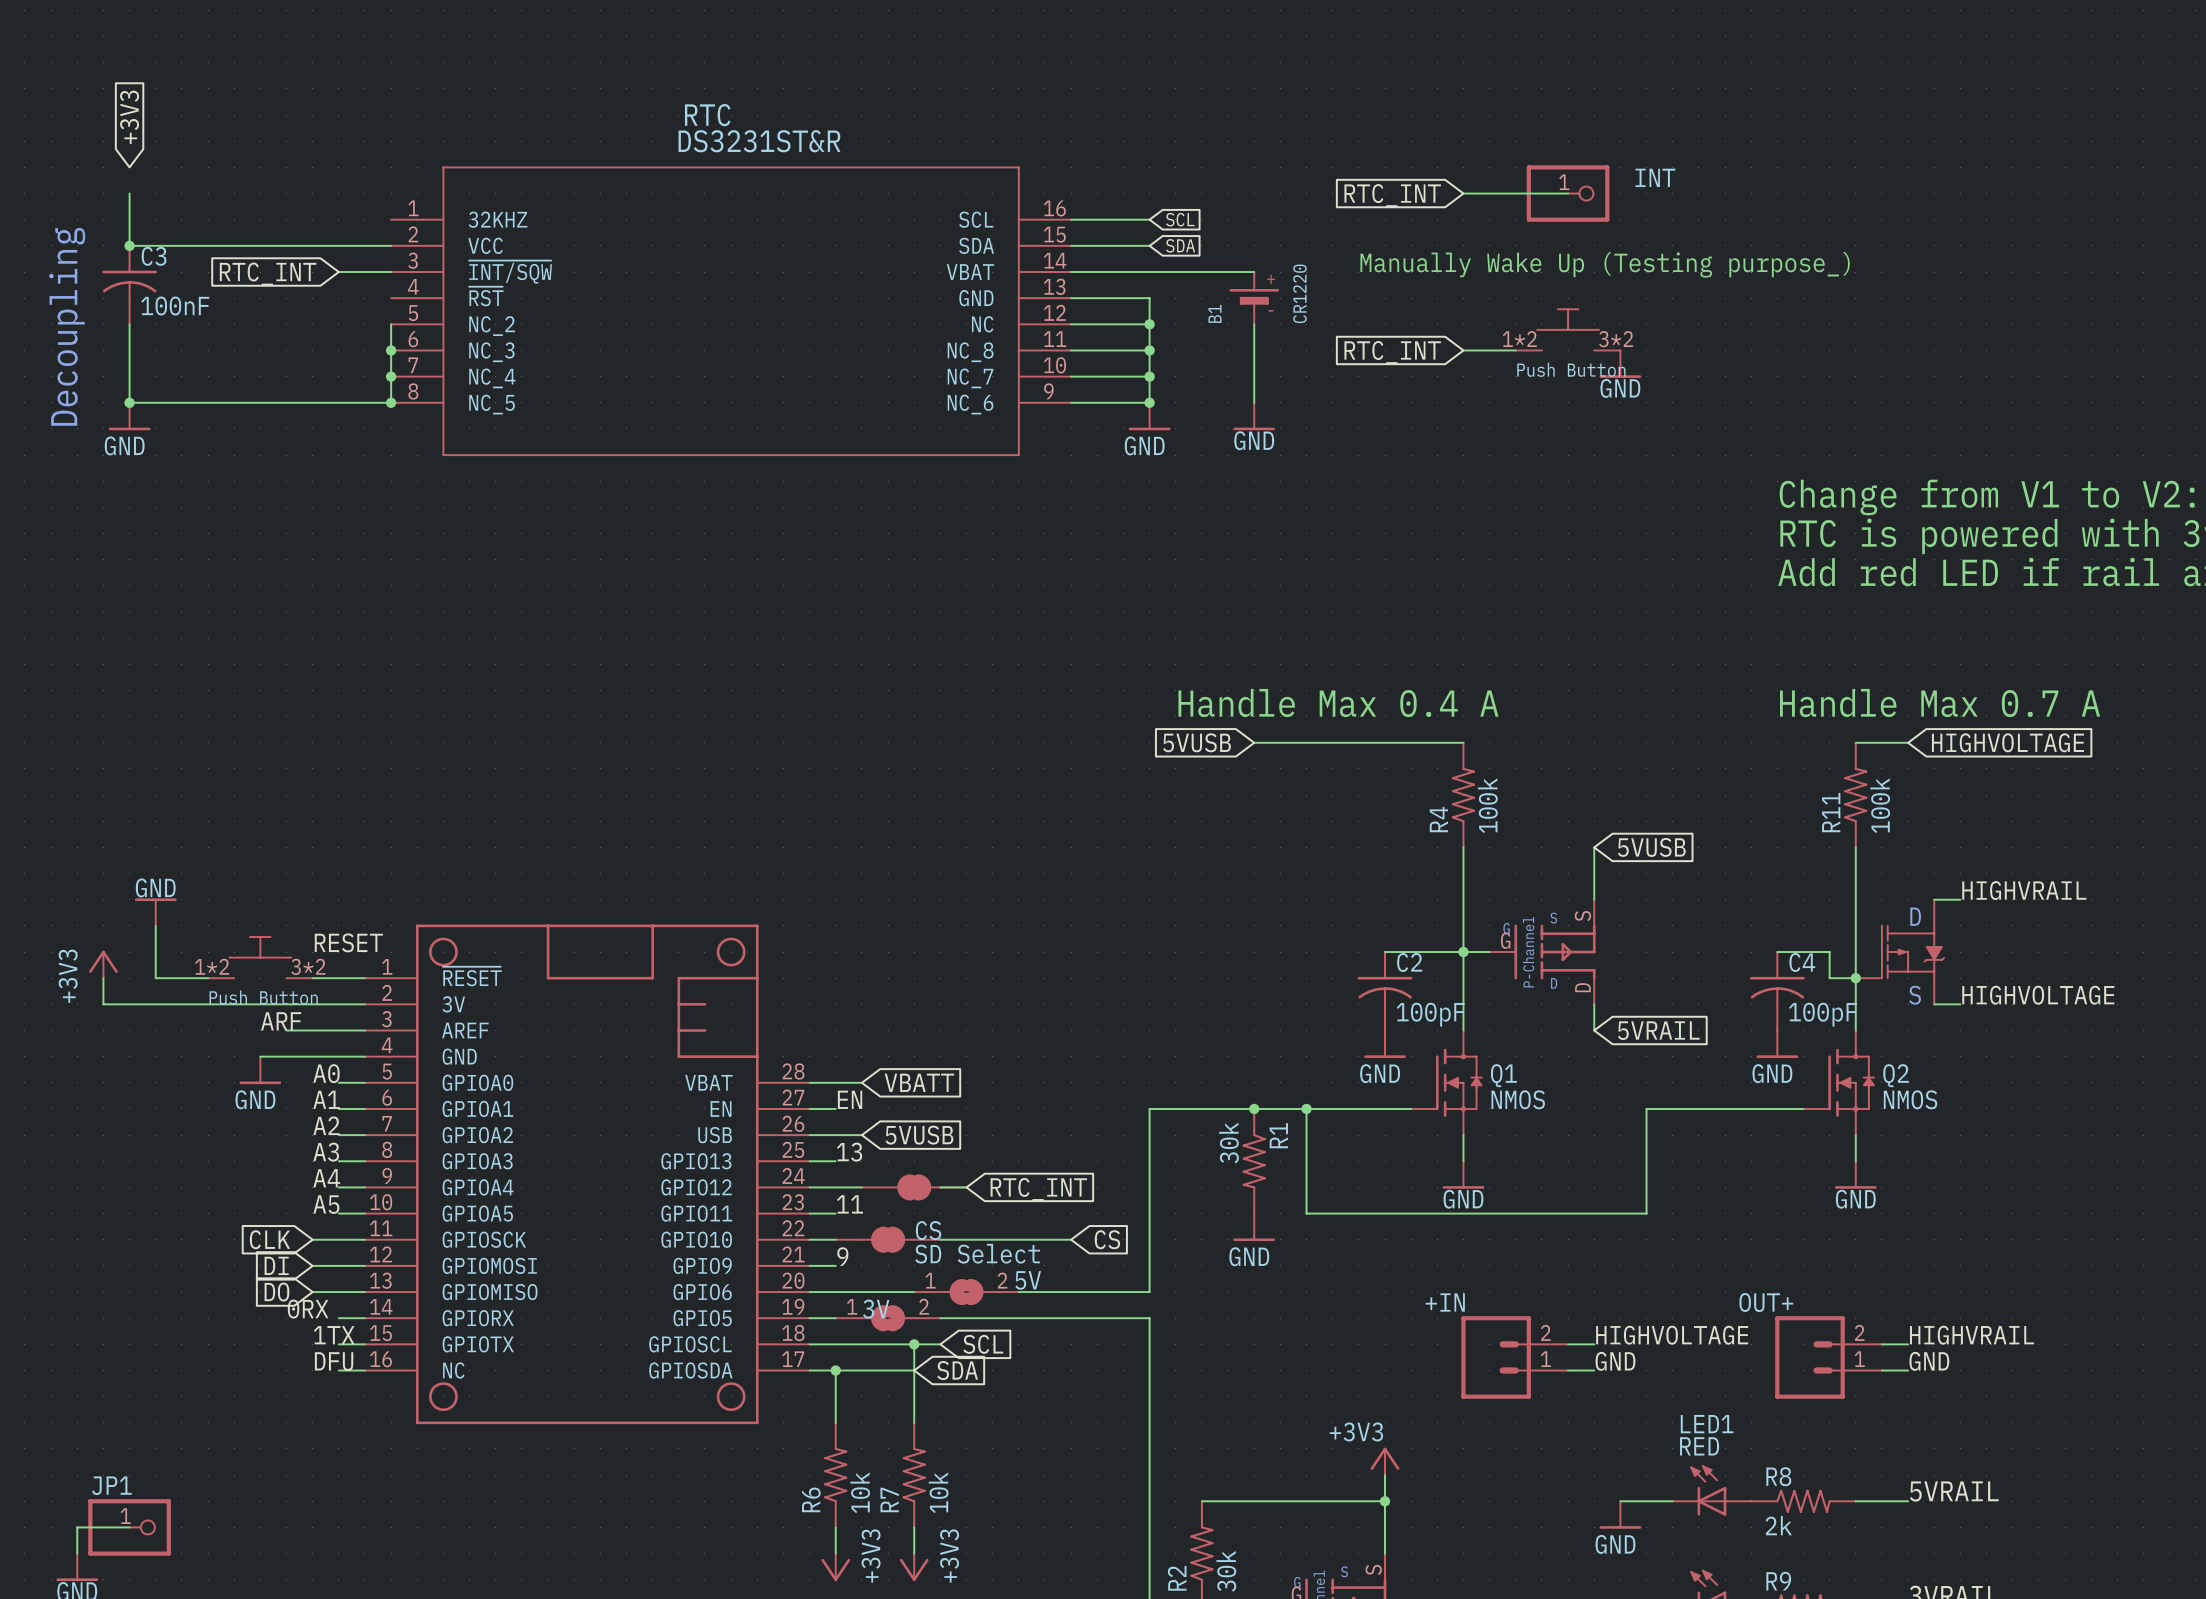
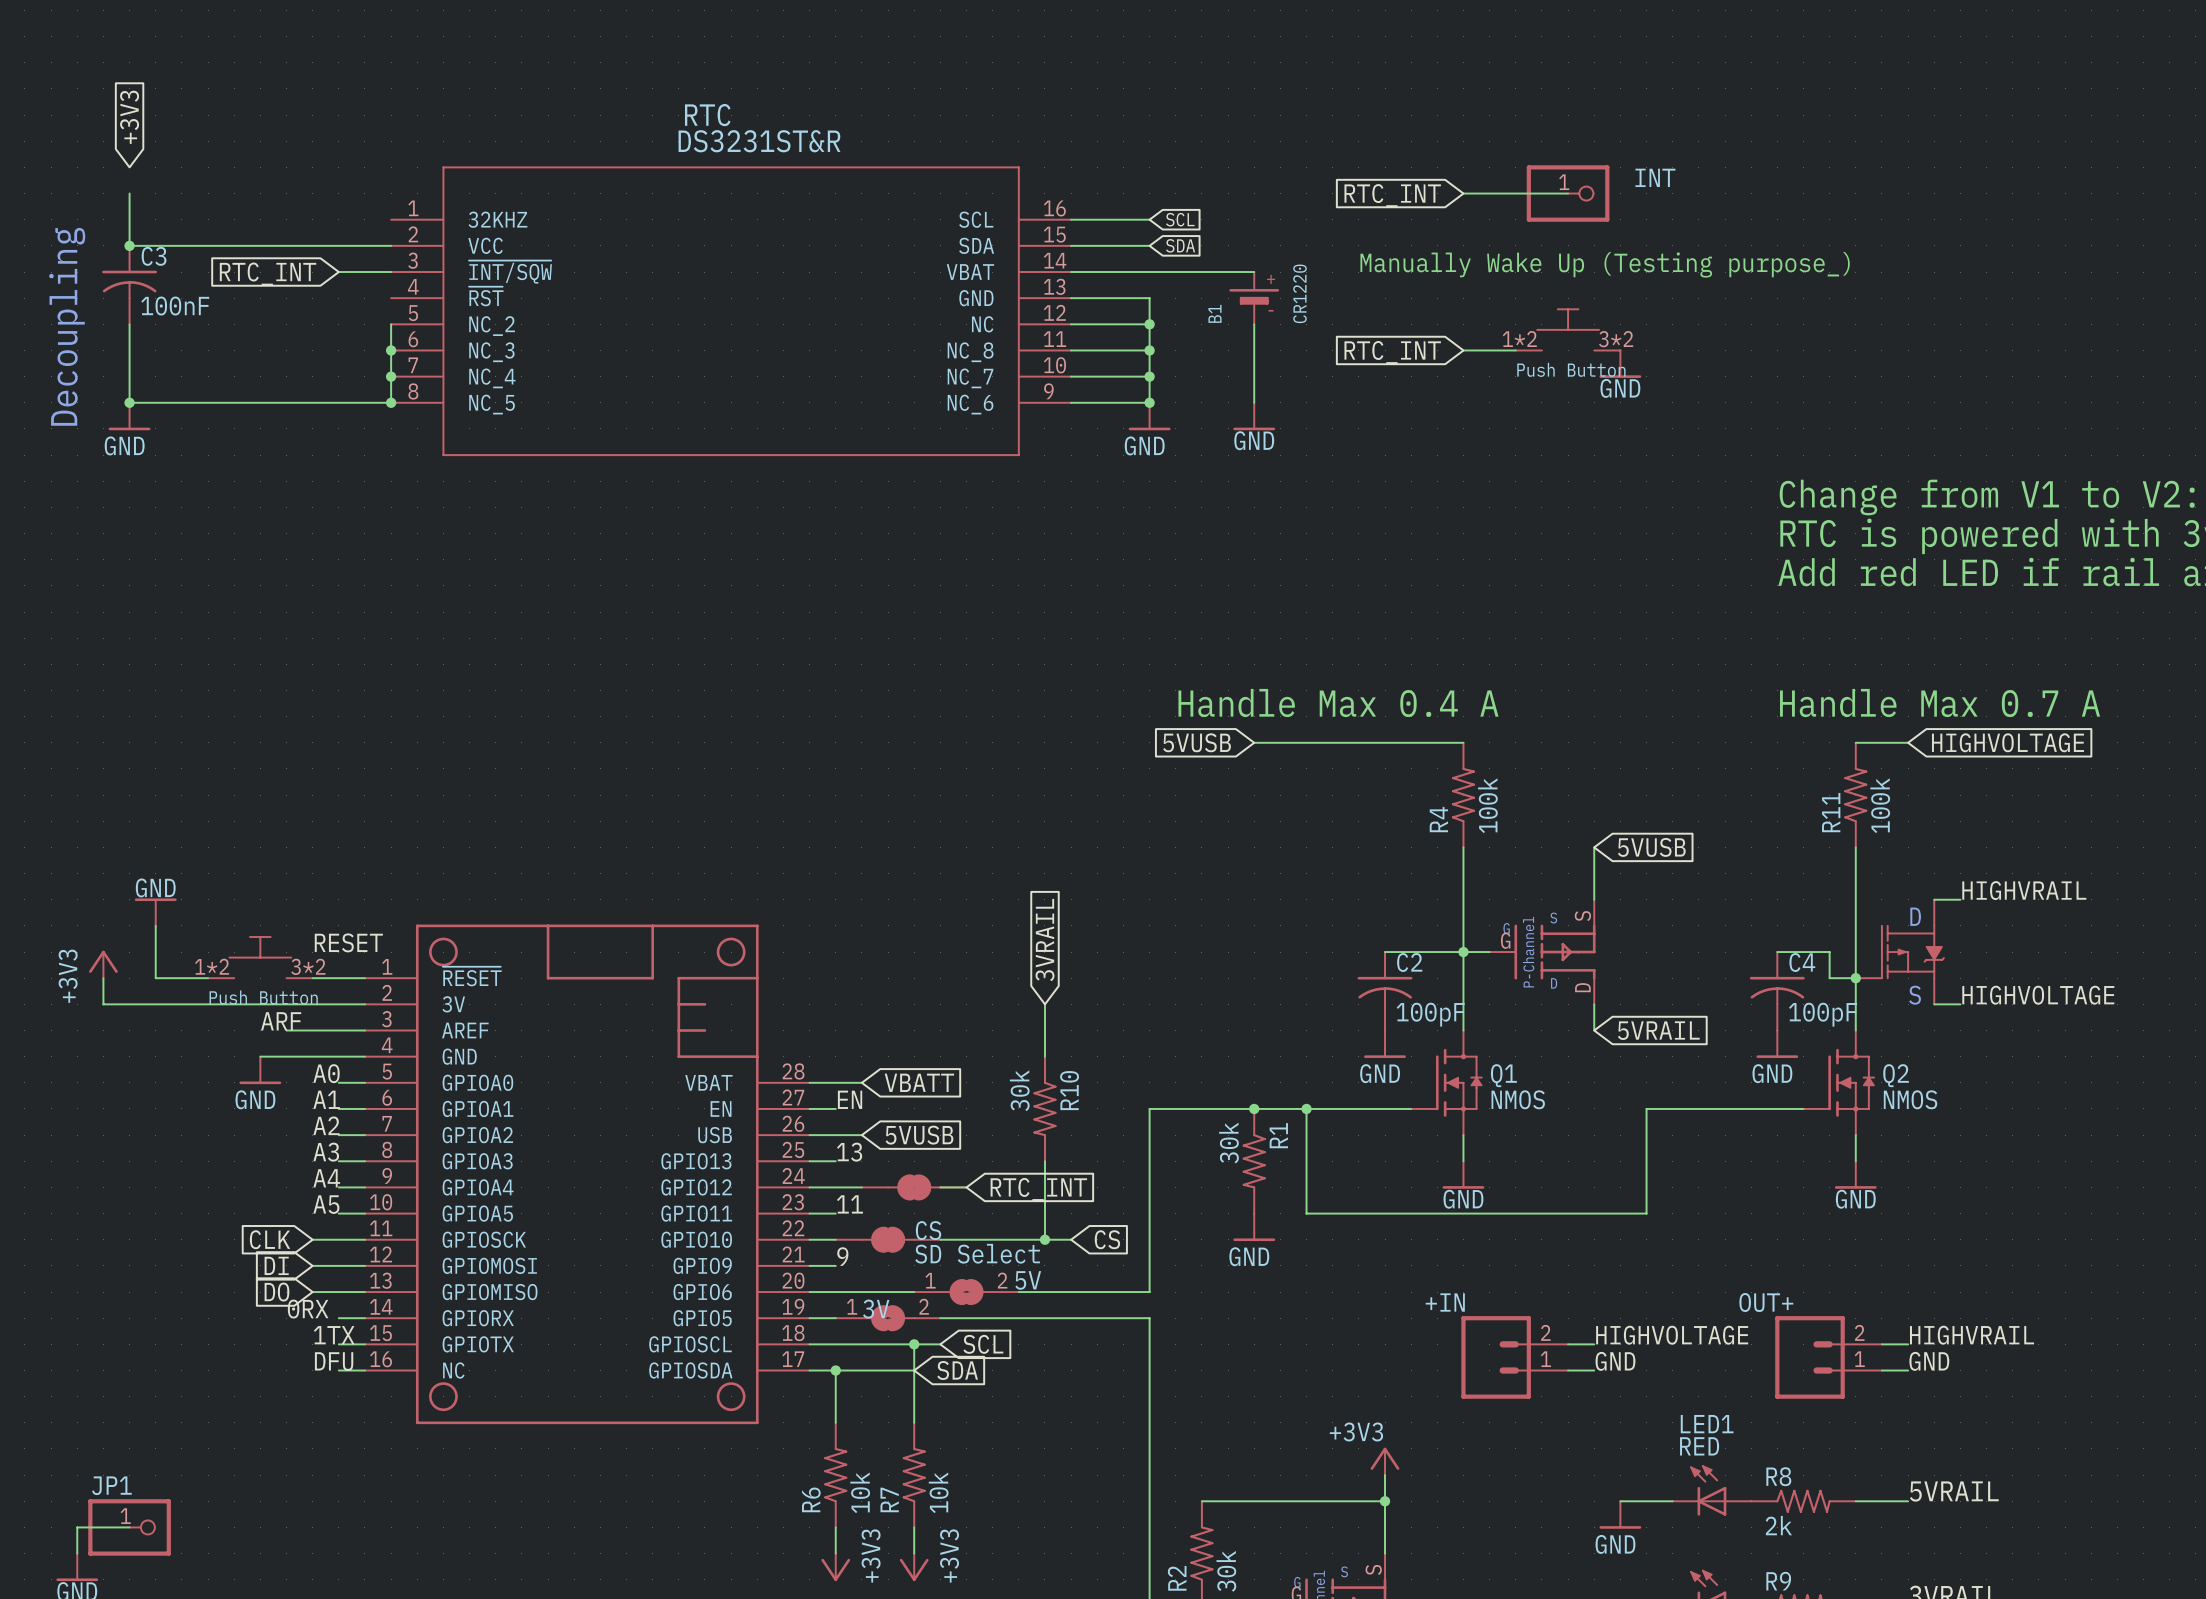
global label: none -> 3VRAIL (1044, 940)
wire: none -> (1044, 1004) (1044, 1056)
R10: none -> 30k (1044, 1108)
wire: none -> (1044, 1161) (1044, 1239)
junction: none -> (1044, 1239)

